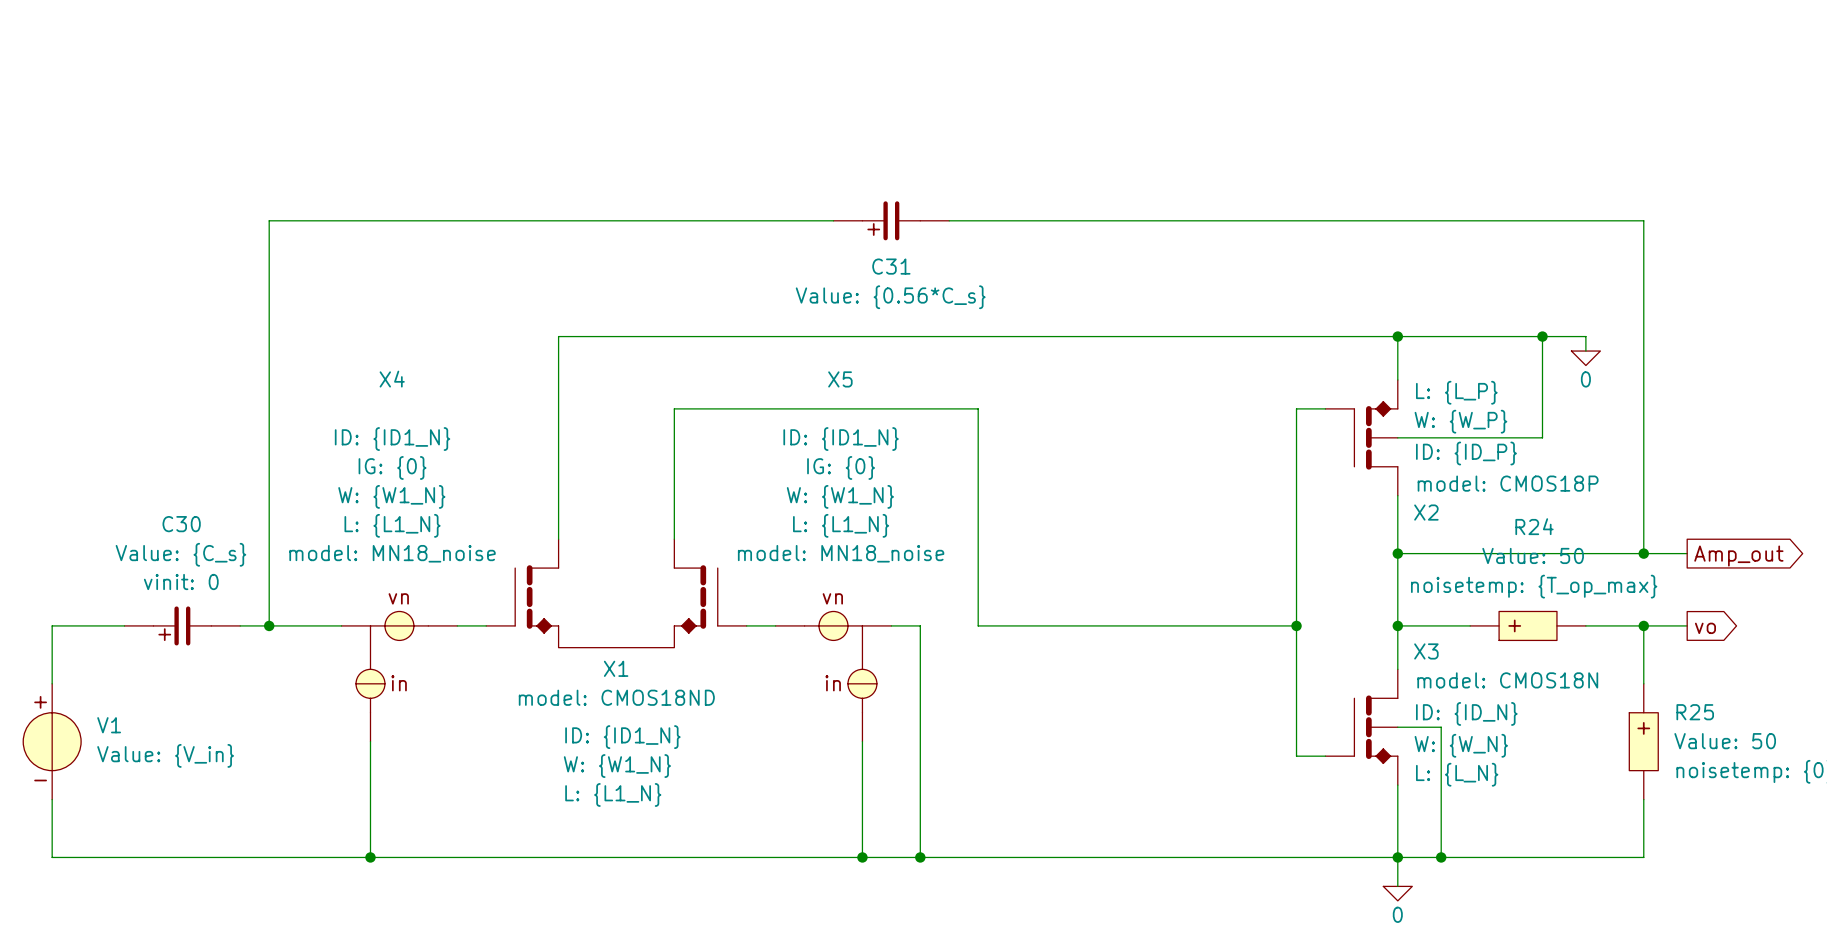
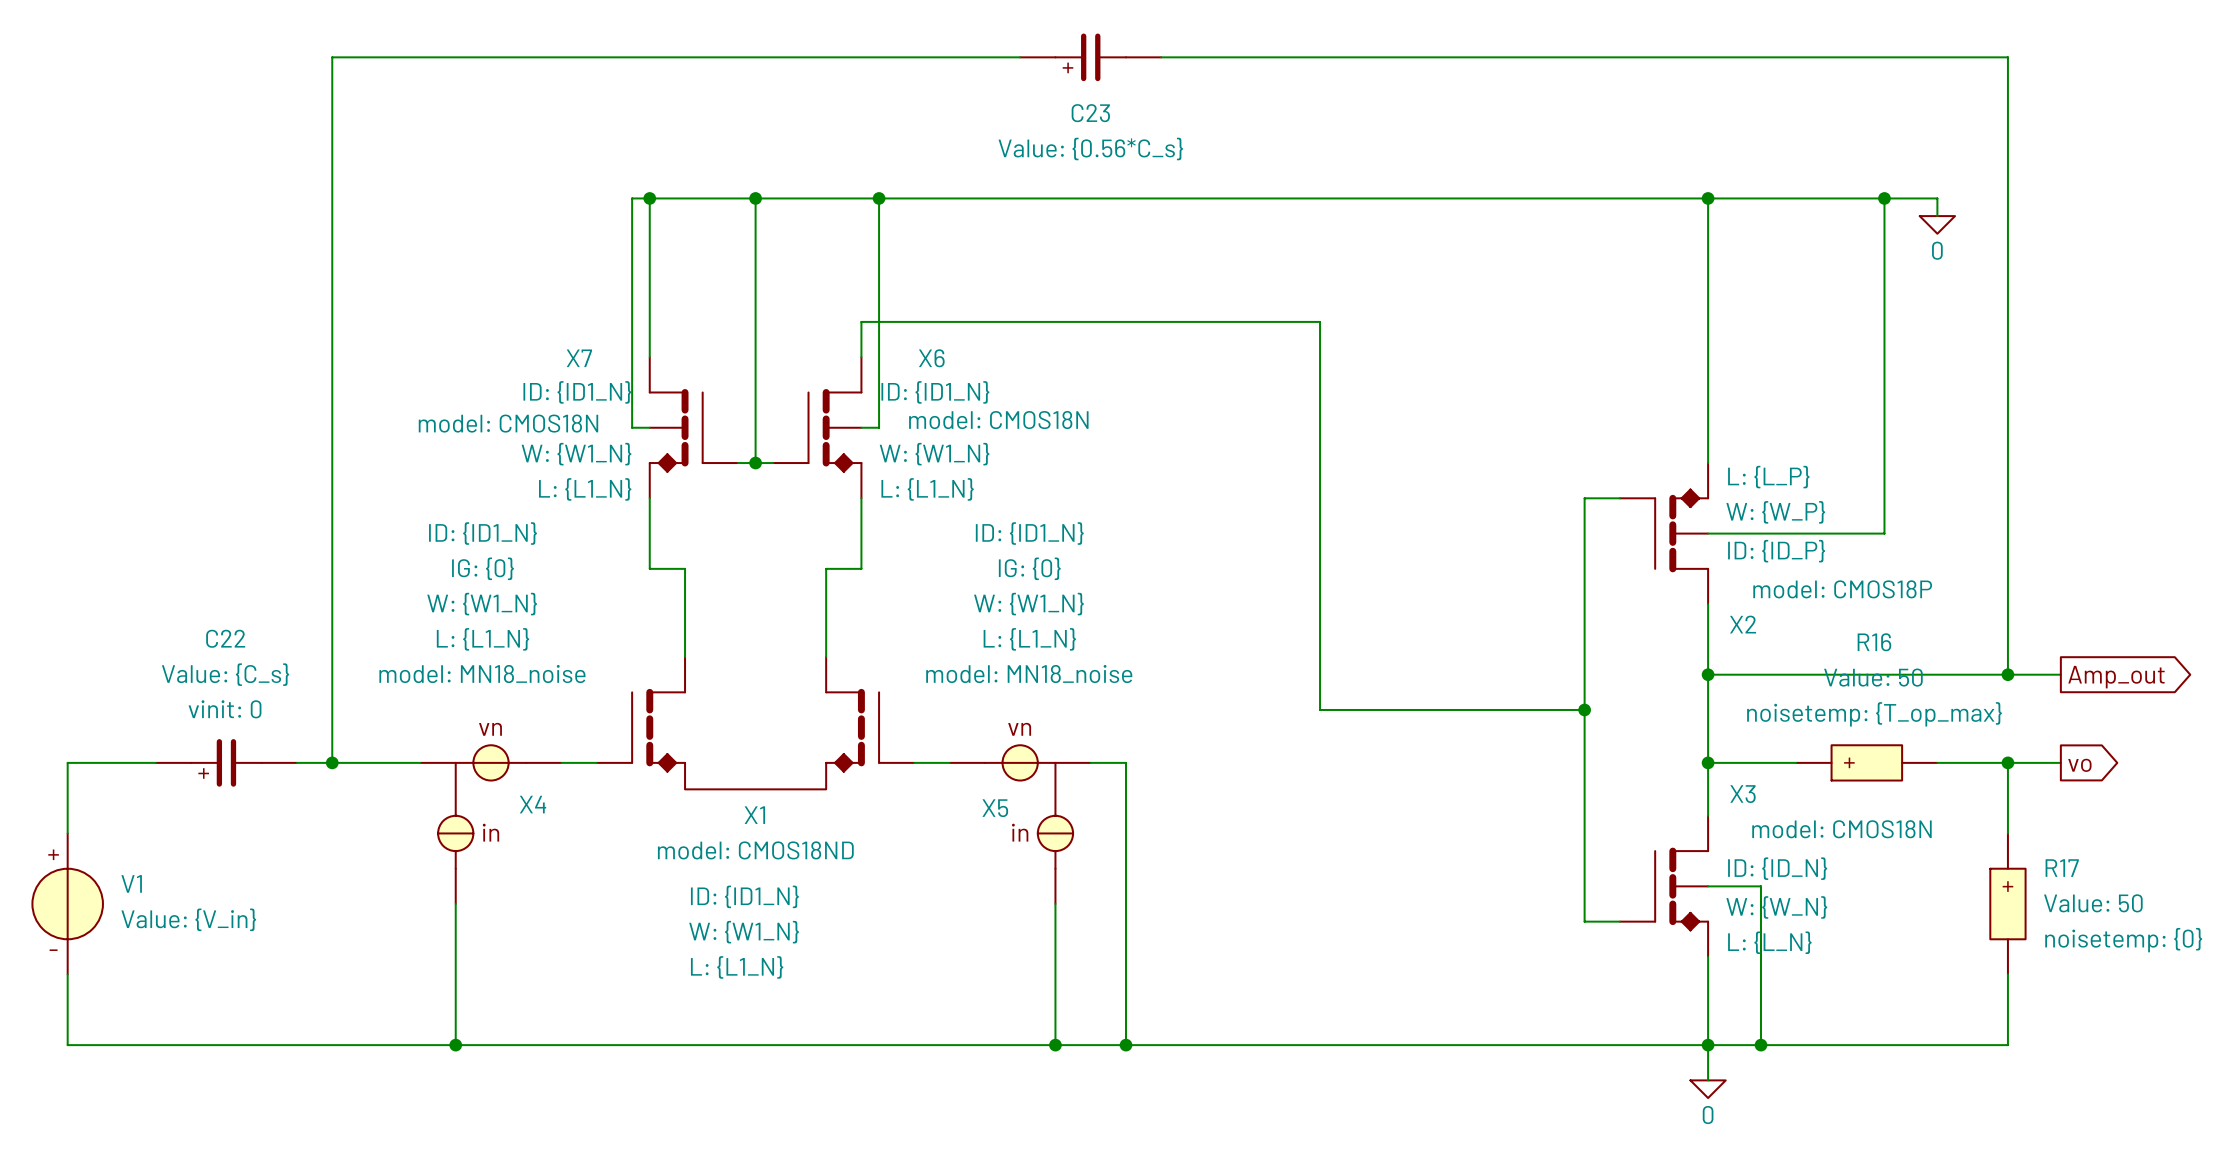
C23: none -> Value: {0.56*C_s} (1090, 57)
wire: none -> (649, 198) (649, 357)
junction: none -> (649, 198)
wire: none -> (755, 198) (755, 463)
junction: none -> (755, 198)
wire: none -> (879, 198) (879, 427) (861, 427)
junction: none -> (879, 198)
wire: none -> (1708, 198) (1708, 410)
junction: none -> (1708, 198)
wire: none -> (1884, 198) (1884, 410)
junction: none -> (1884, 198)
wire: none -> (1937, 216) (1937, 198) (632, 198) (632, 427) (649, 427)
wire: (269, 220) (833, 220) -> (332, 269) (332, 57) (1020, 57)
C31: Value: {0.56*C_s} (891, 220) -> none
wire: (949, 220) (1643, 220) -> (1161, 57) (2007, 57) (2007, 269)
wire: none -> (861, 357) (861, 321) (1320, 321) (1320, 709) (1584, 709)
junction: (1397, 336) -> none
junction: (1542, 336) -> none
X7: none -> (693, 427)
X6: none -> (817, 427)
wire: (1585, 351) (1585, 336) (558, 336) (558, 466) -> (649, 498) (649, 568) (685, 568)
power symbol position: 0 (1585, 358) -> 0 (1937, 224)
X4 name position: X4 (392, 379) -> X4 (533, 804)
wire: none -> (737, 463) (773, 463)
junction: none -> (755, 463)
X5 name position: X5 (840, 379) -> X5 (995, 808)
wire: (674, 466) (674, 408) (978, 408) (978, 625) (1296, 625) -> (826, 568) (861, 568) (861, 498)
C30 name: C30 (181, 524) -> C22 (225, 638)
R24 name: R24 (1534, 526) -> R16 (1874, 642)
junction position: (1296, 625) -> (1584, 709)
R25 name: R25 (1695, 712) -> R17 (2062, 868)

